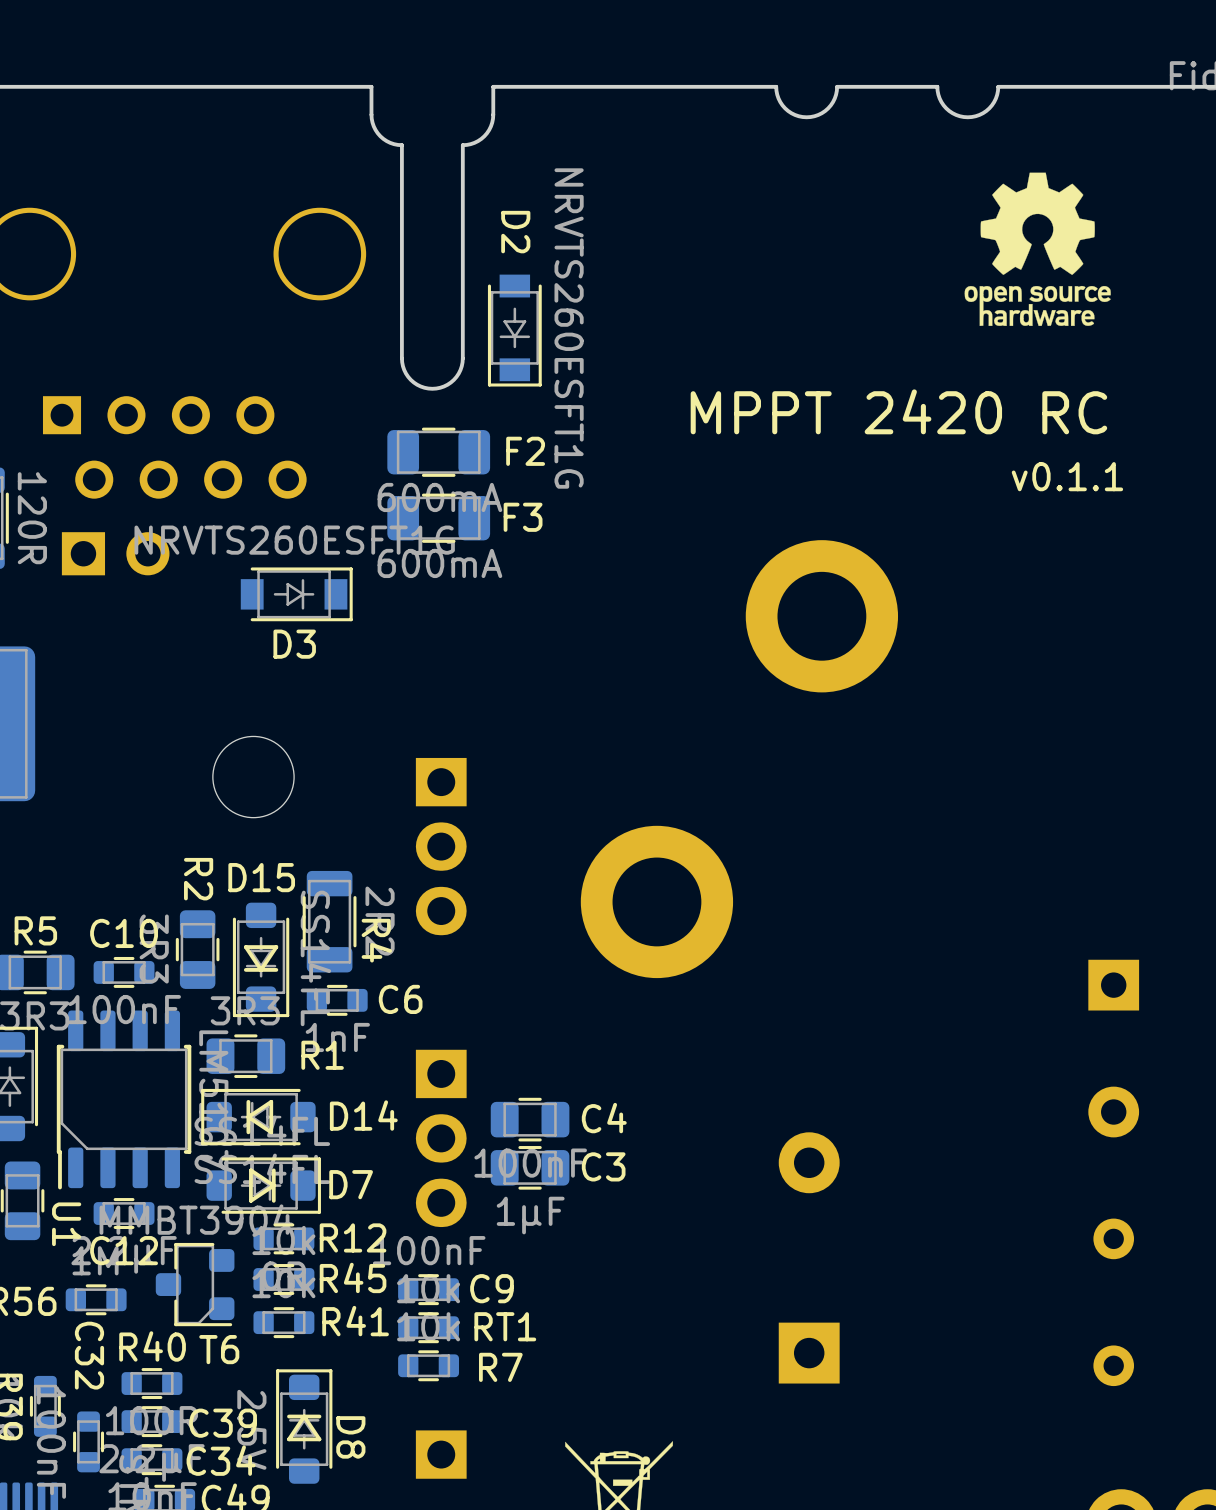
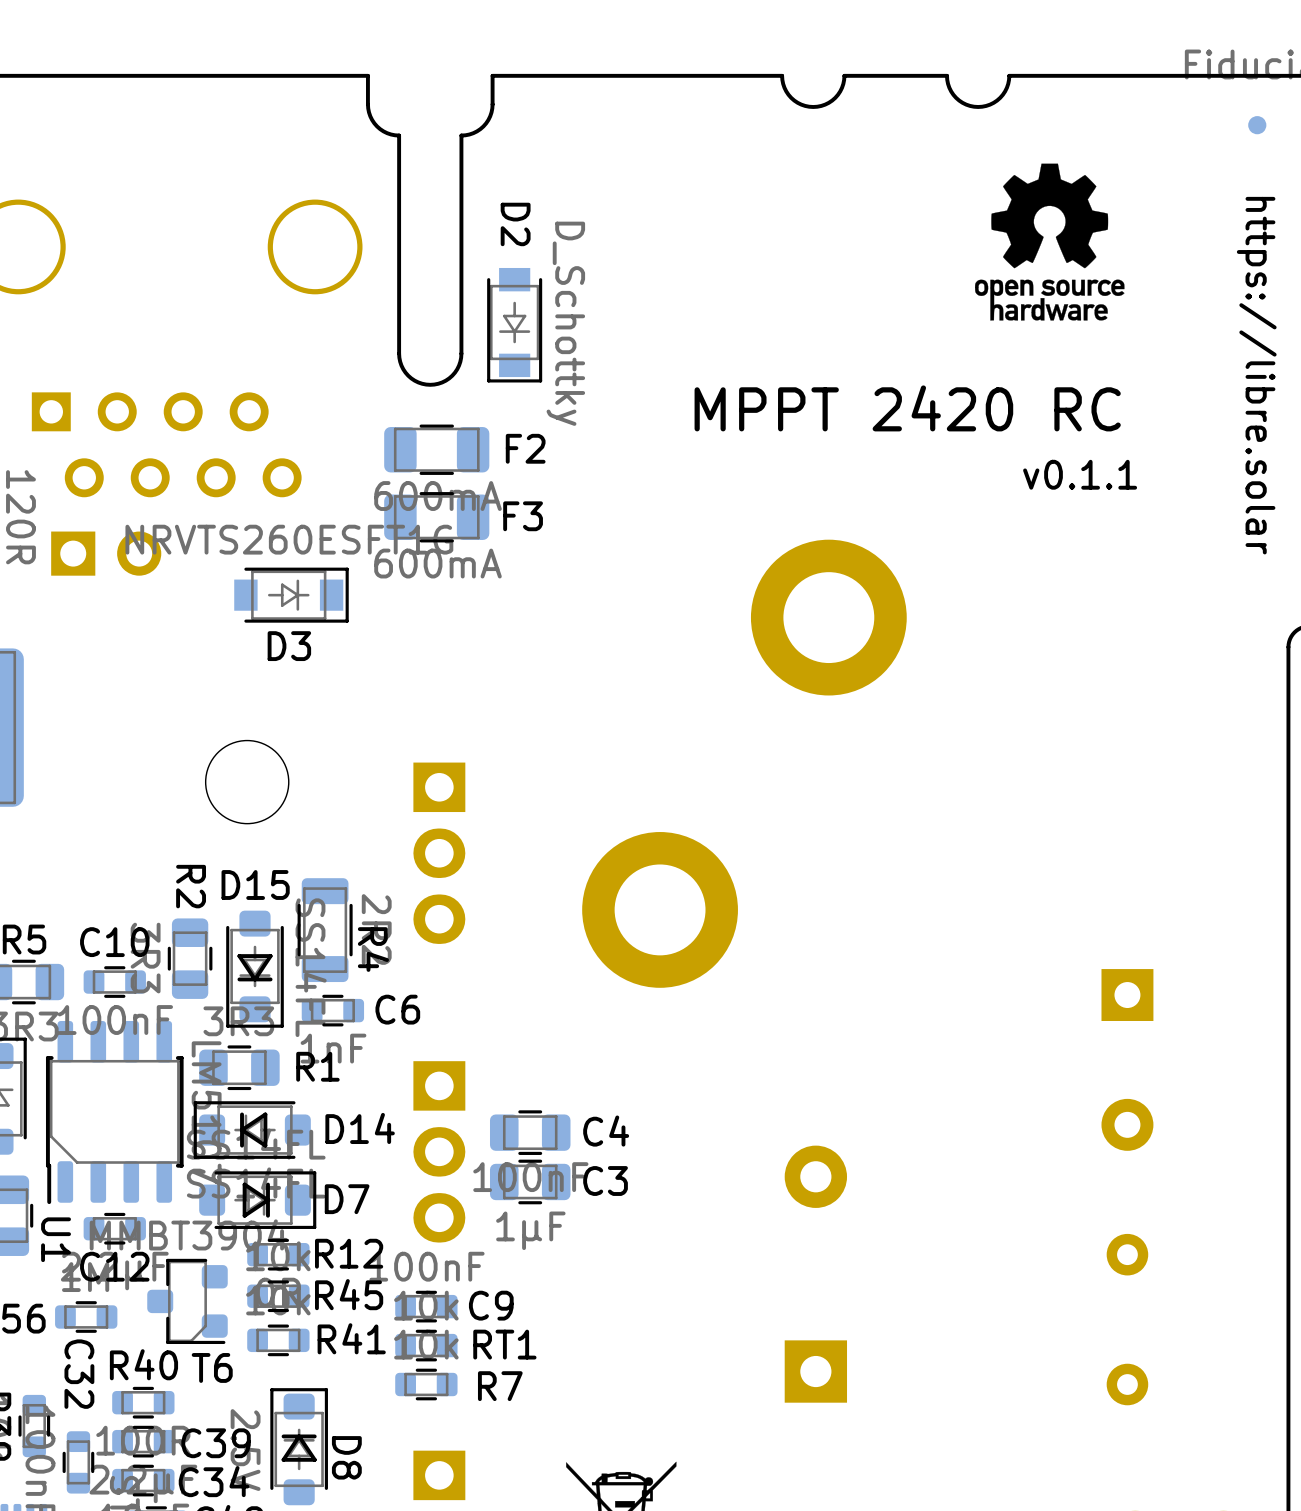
D2 value: NRVTS260ESFT1G (569, 328) -> D_Schottky (565, 323)

